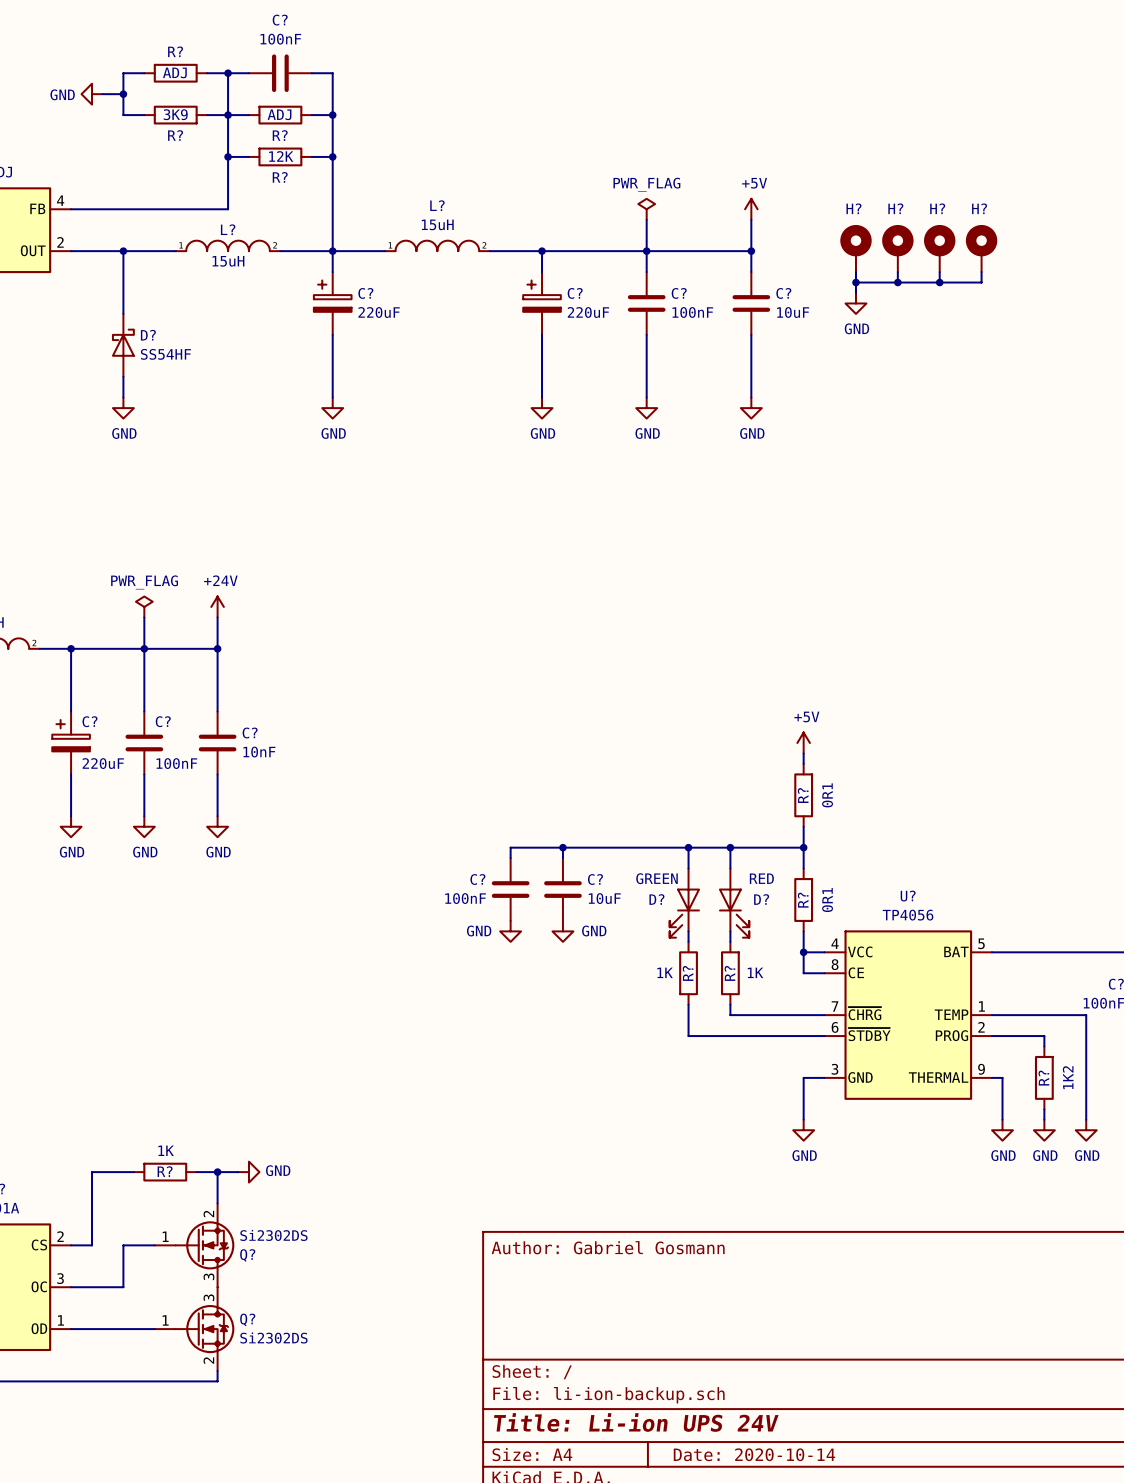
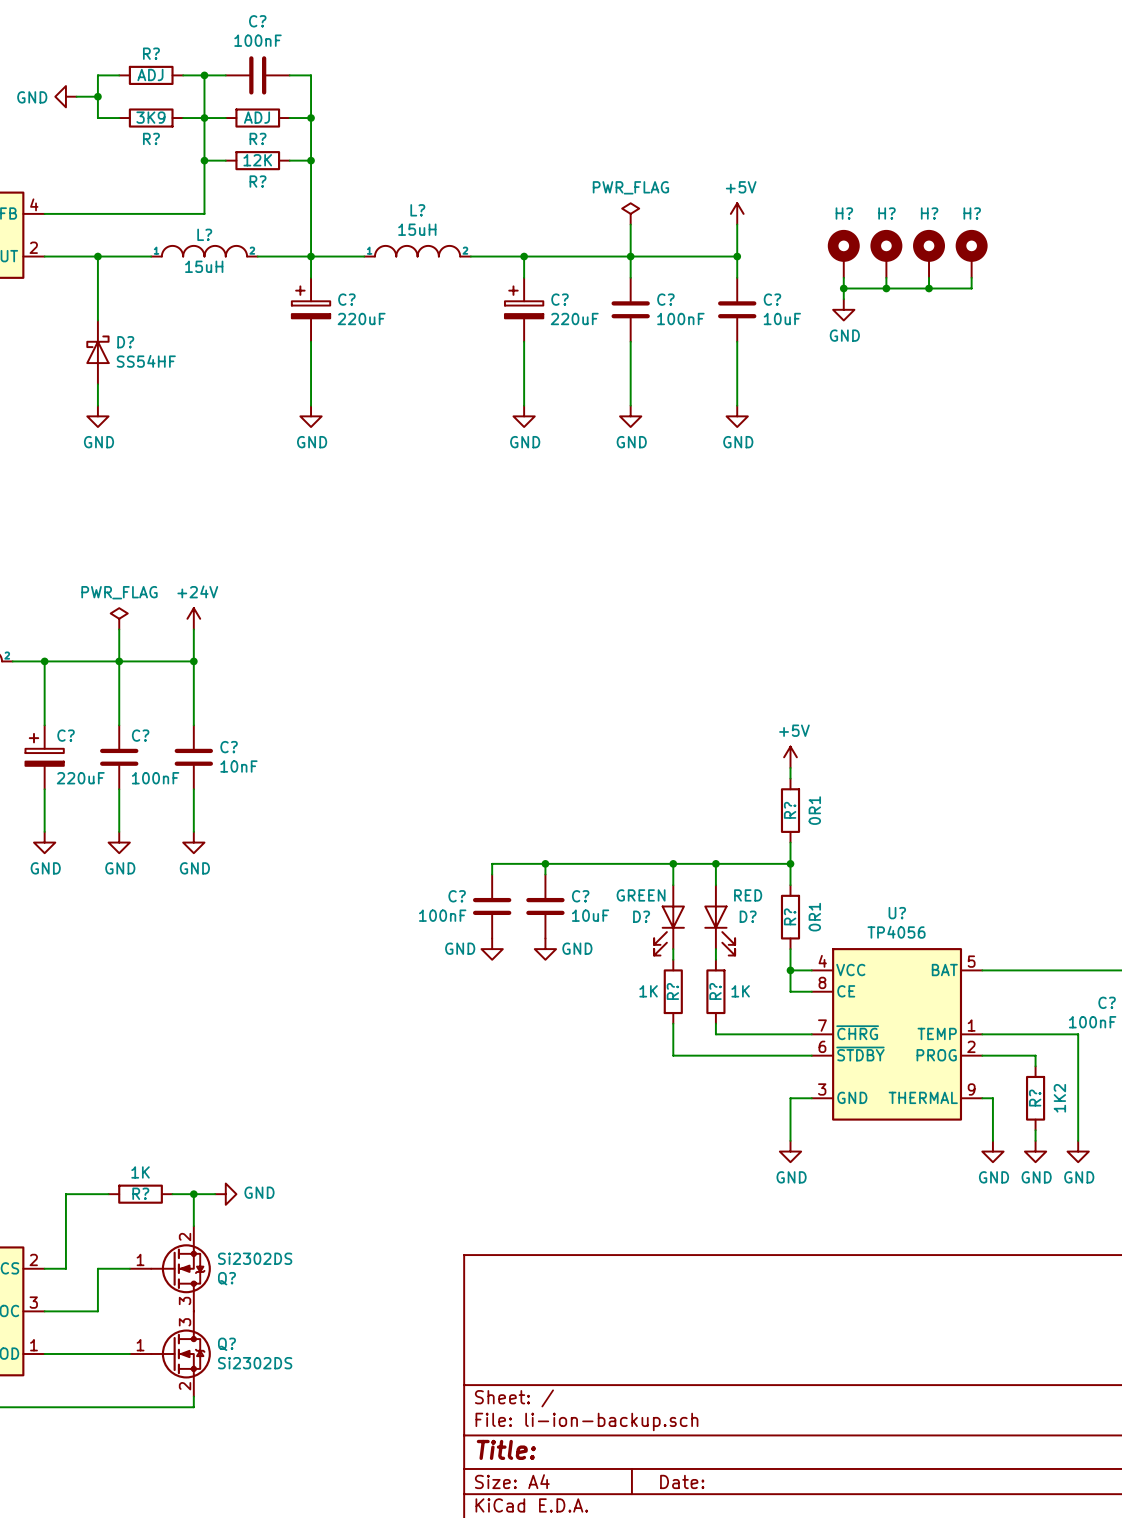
title block: Author: Gabriel Gosmann (608, 1247) -> none
title block: Title: Li-ion UPS 24V (636, 1422) -> Title: (506, 1449)
title block: Date: 2020-10-14 (754, 1454) -> Date: (682, 1481)

